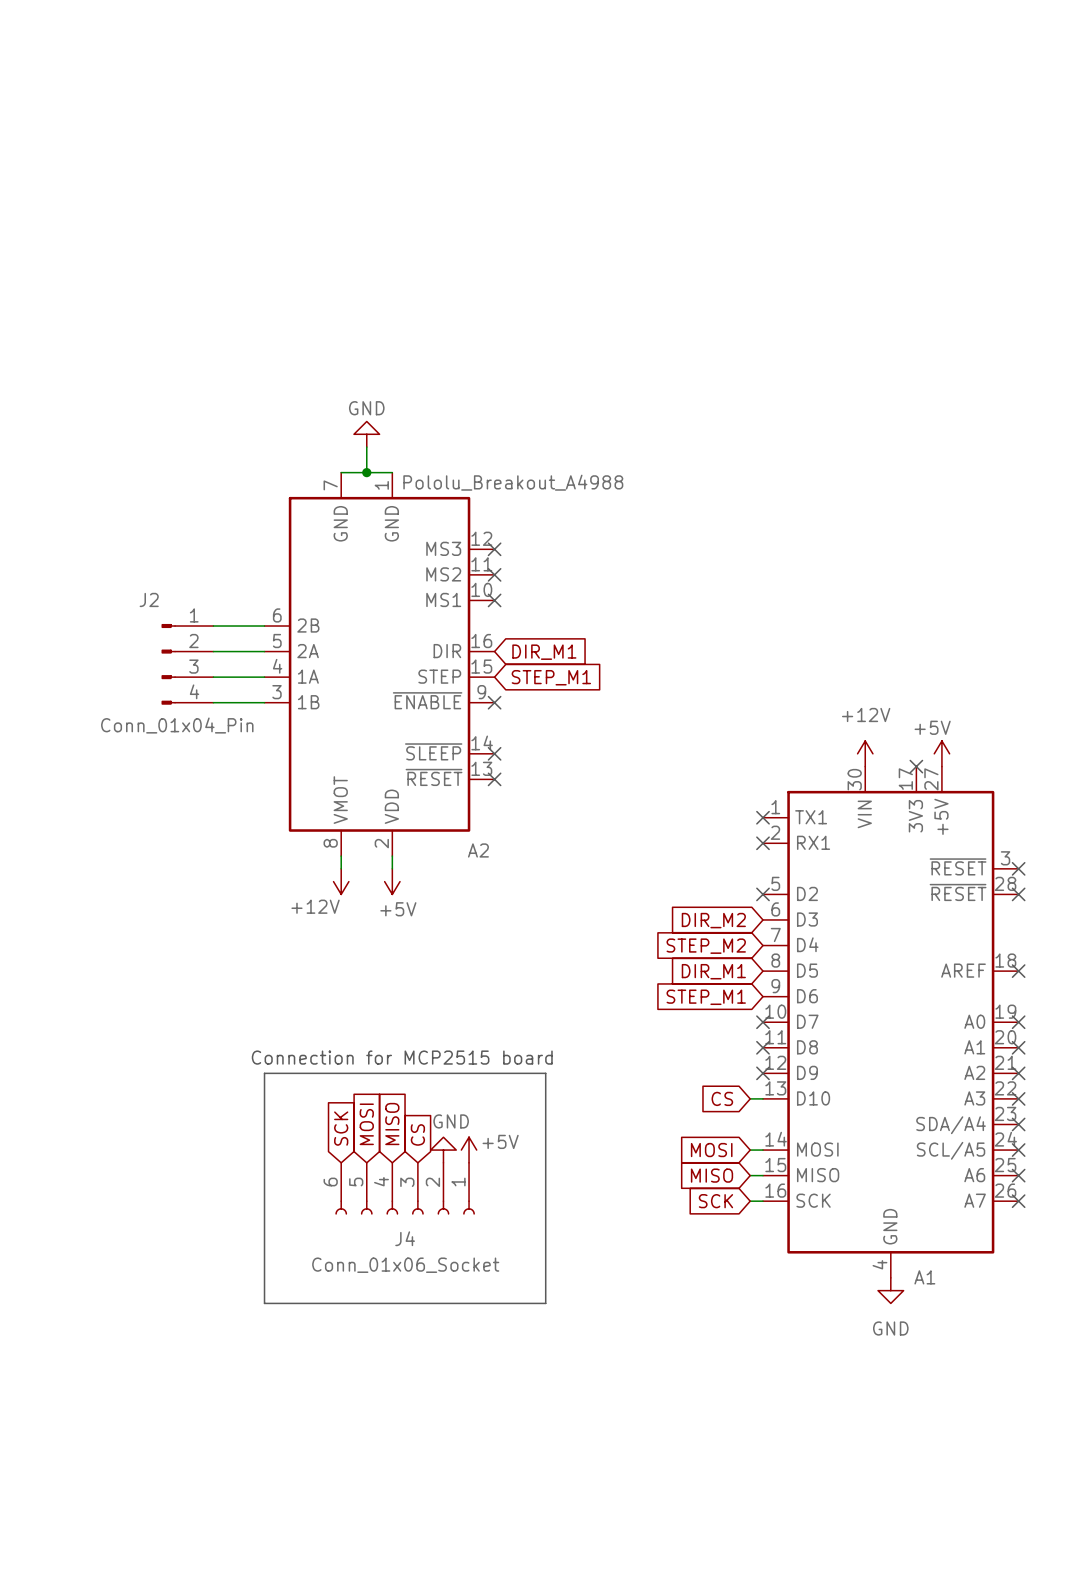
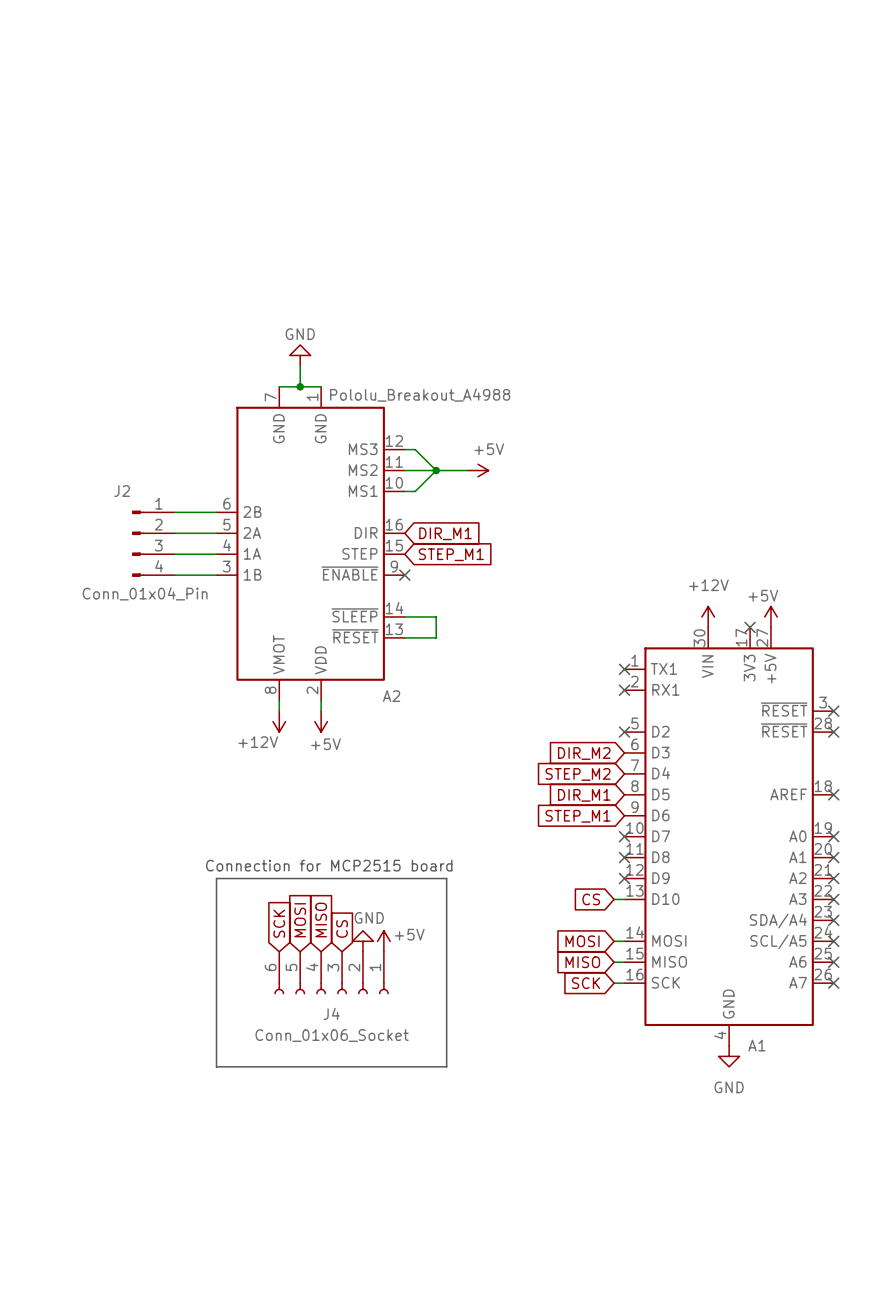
wire: none -> (404, 449) (415, 449) (436, 470) (415, 491) (404, 491)
no-connect mark: (494, 549) -> none
wire: none -> (404, 470) (467, 470)
no-connect mark: (494, 574) -> none
junction: none -> (436, 470)
power symbol: none -> +5V (478, 470)
no-connect mark: (494, 600) -> none
wire: none -> (404, 616) (436, 616) (436, 637) (404, 637)
no-connect mark: (494, 753) -> none
no-connect mark: (494, 779) -> none

